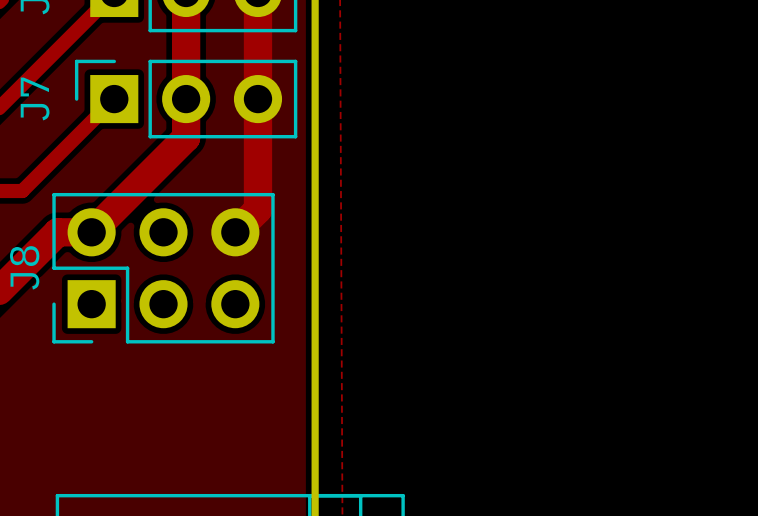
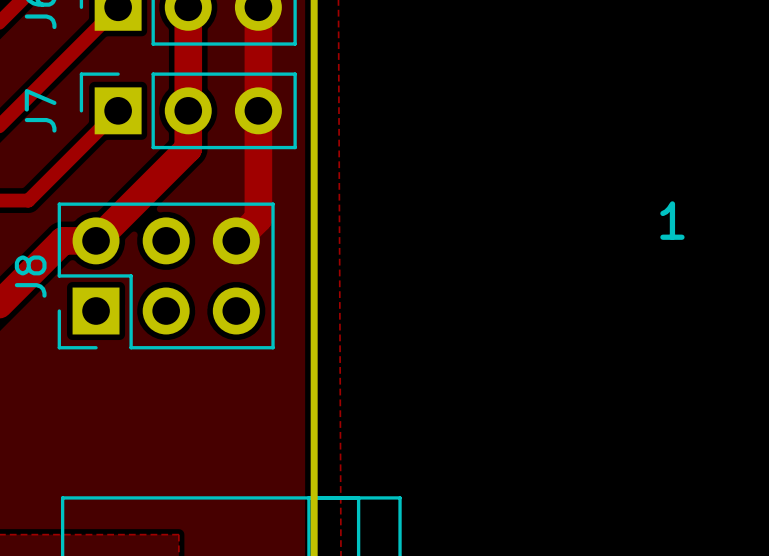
text: none -> 1 (672, 220)

